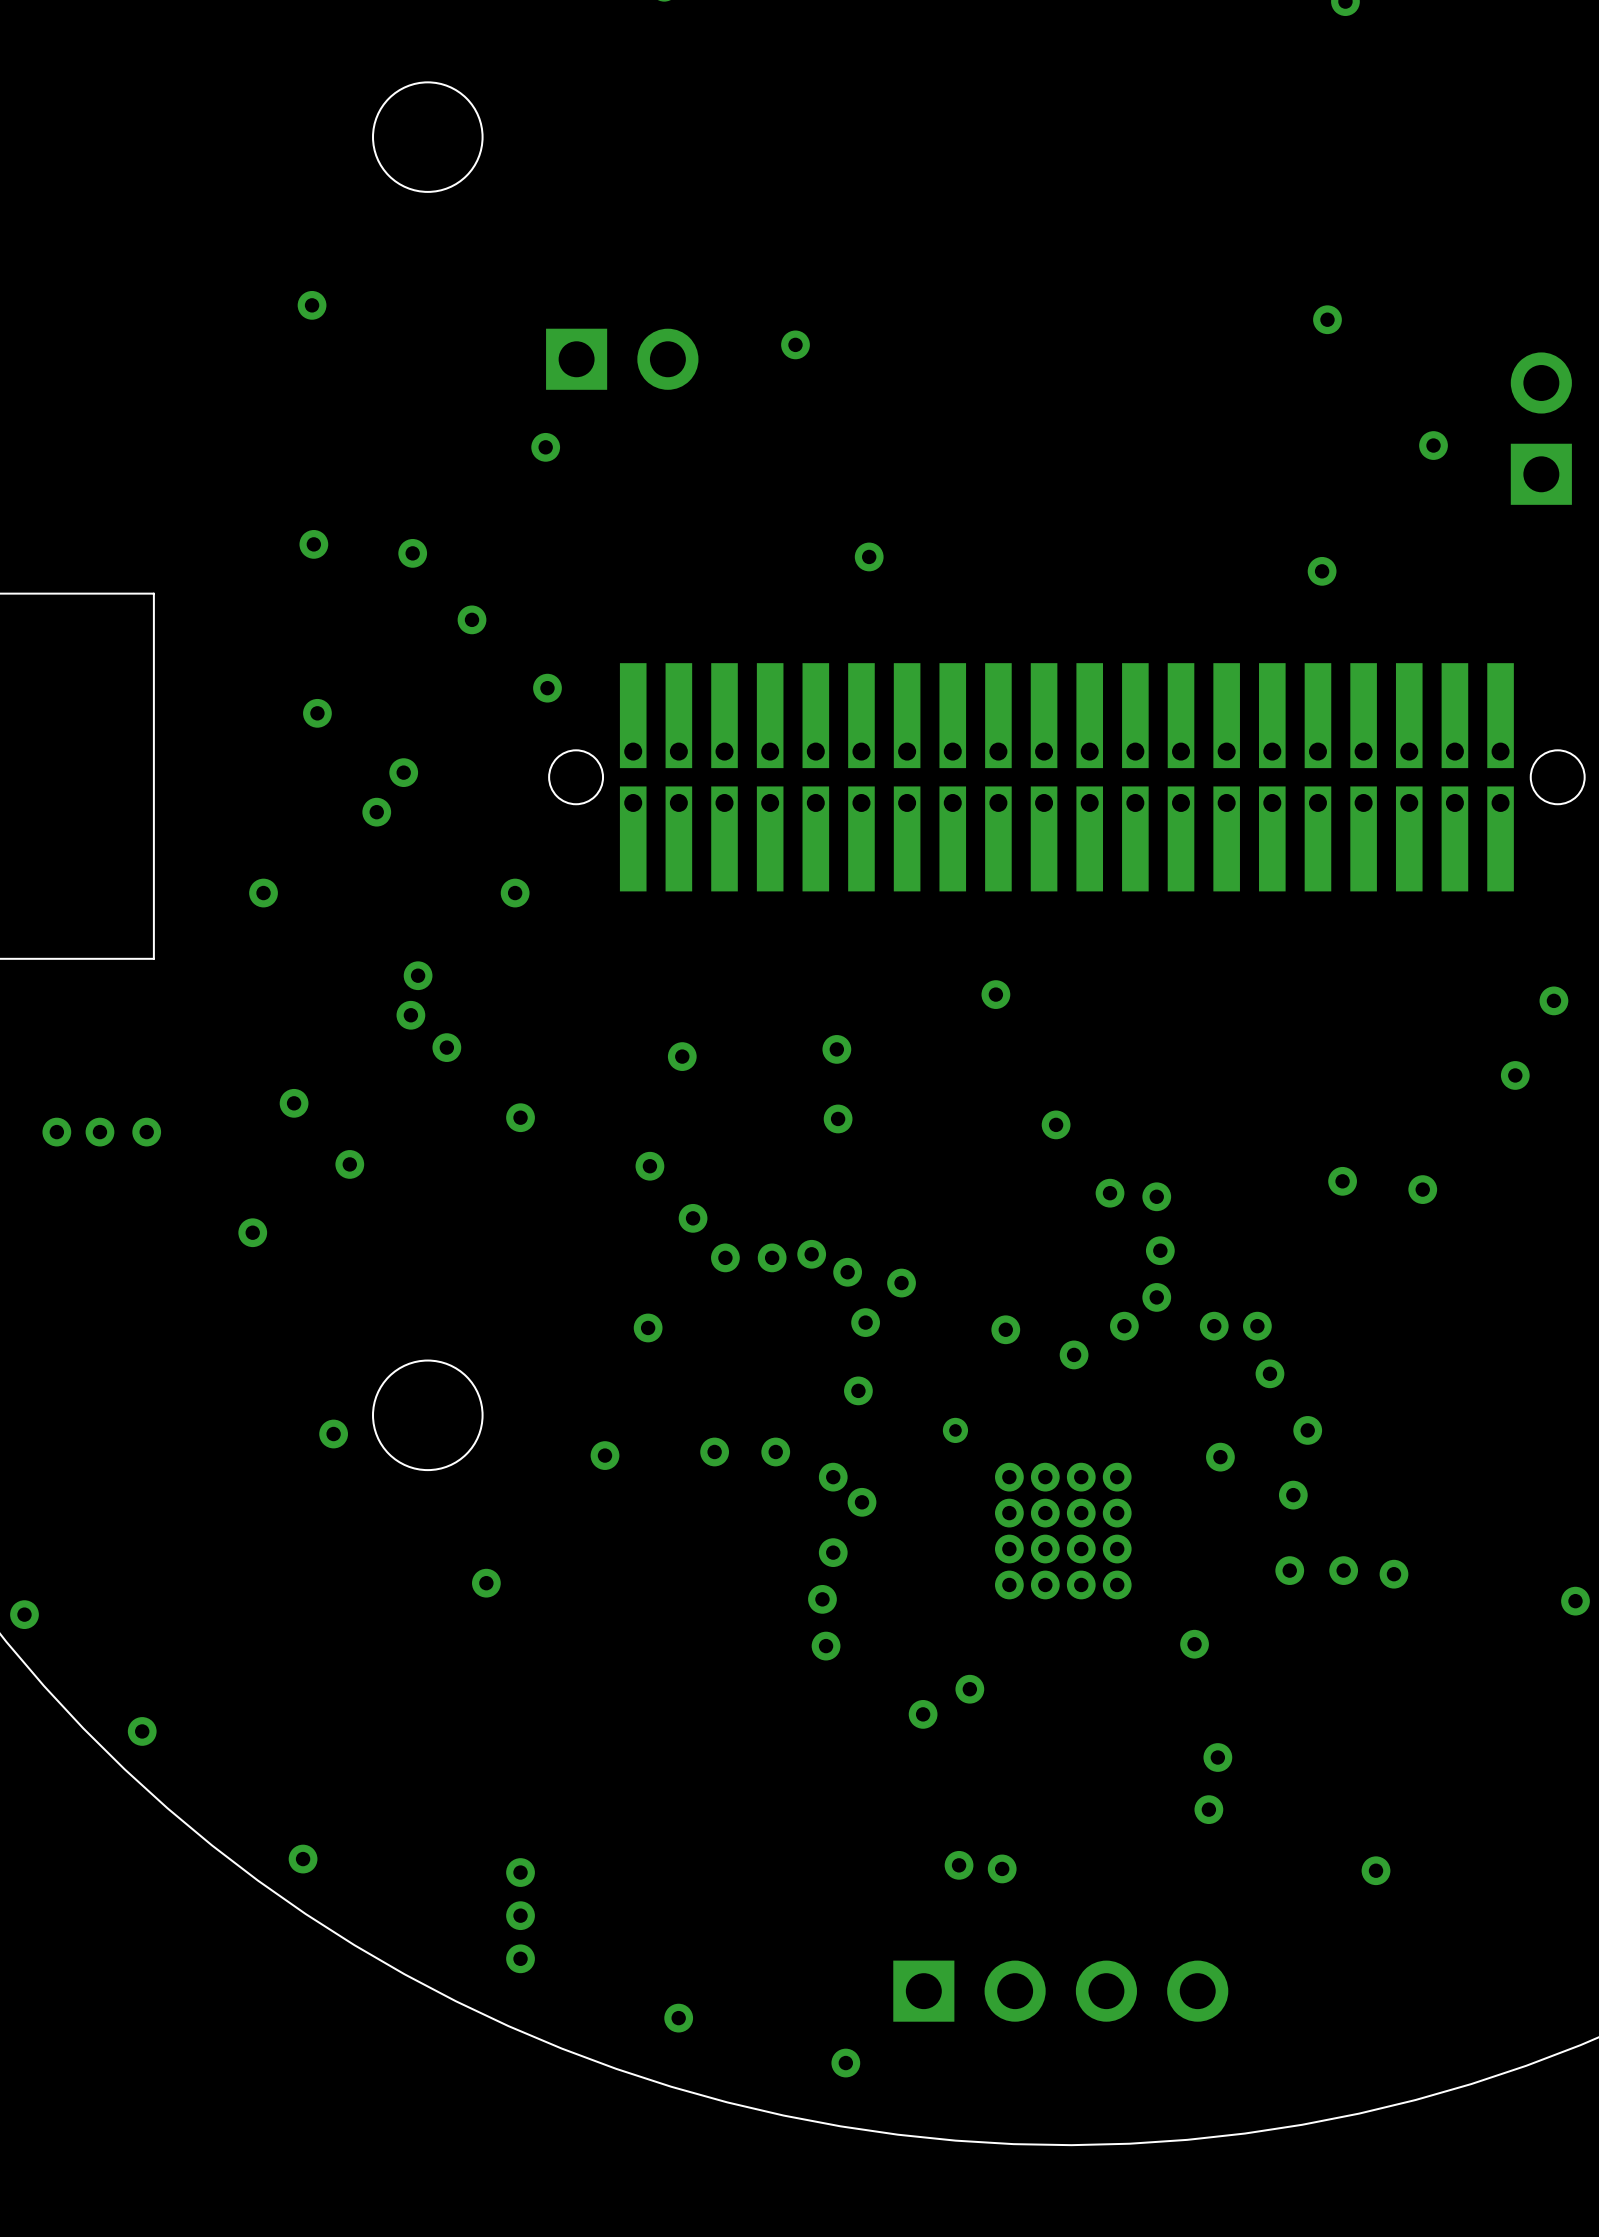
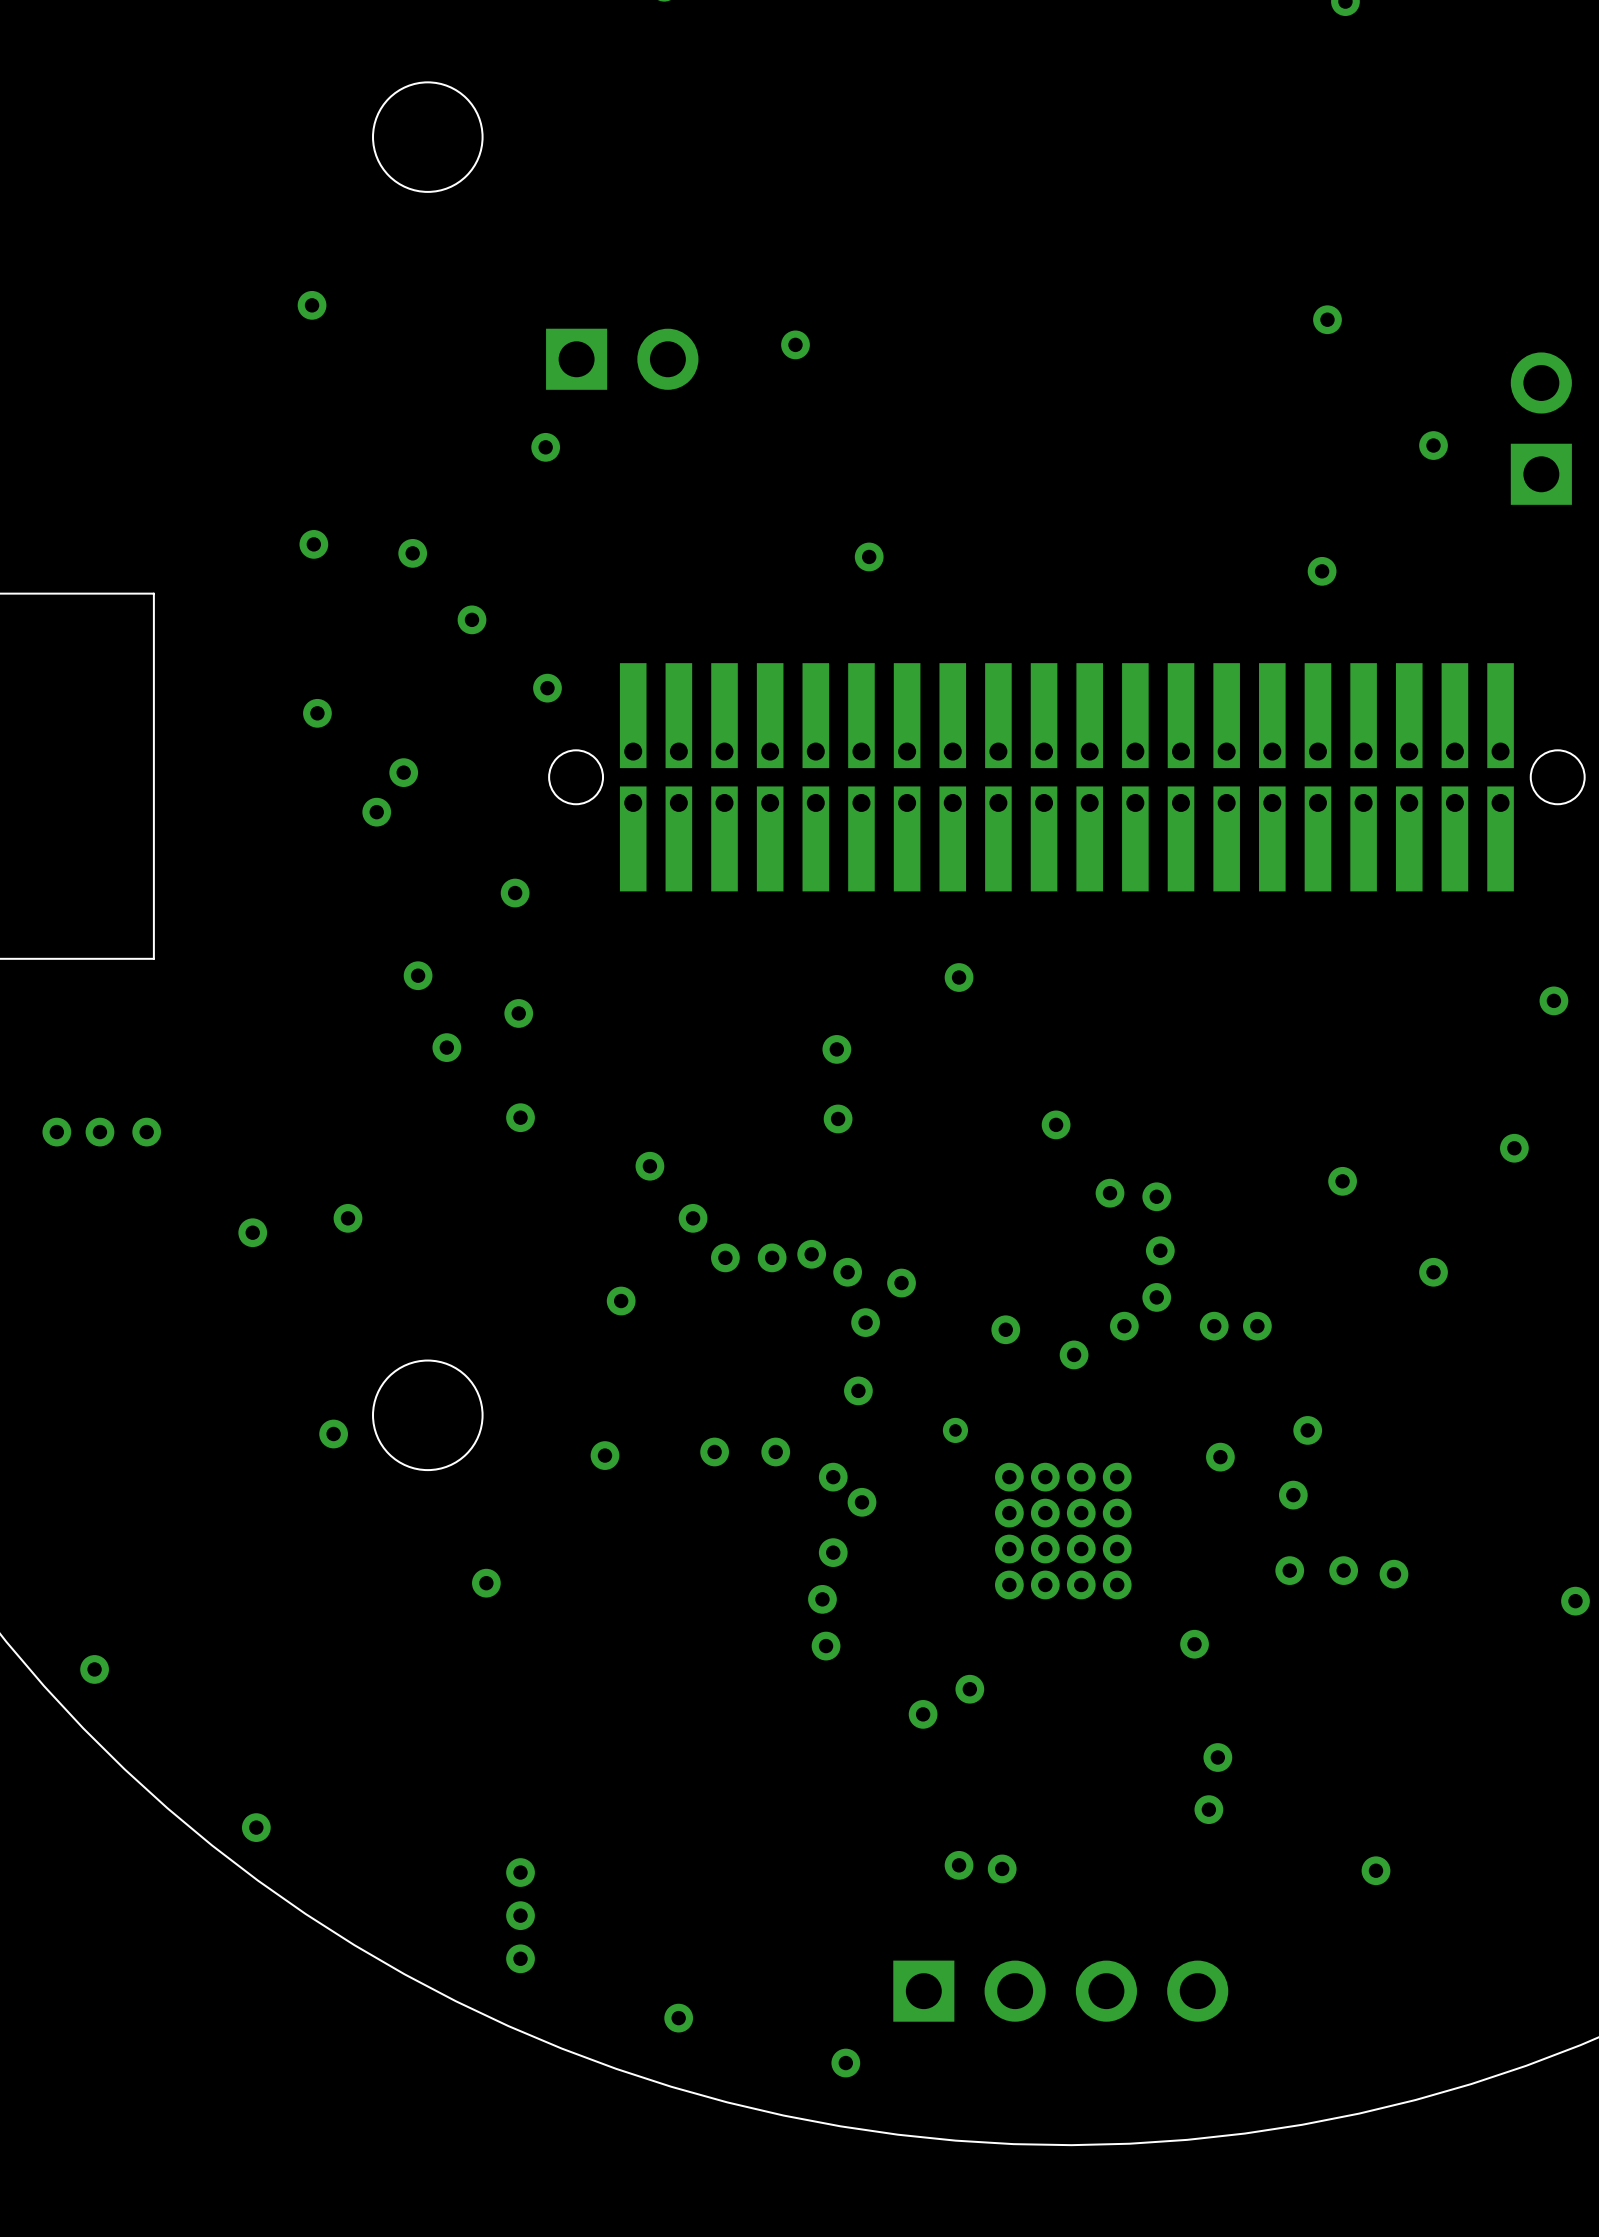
via: (263, 893) -> none
via position: (995, 994) -> (959, 977)
via: none -> (518, 1013)
via: (410, 1015) -> none
via: (682, 1056) -> none
via: (1515, 1075) -> none
via: (294, 1103) -> none
via: none -> (1514, 1148)
via position: (349, 1164) -> (347, 1218)
via: (1422, 1189) -> none
via: none -> (1433, 1272)
via position: (648, 1327) -> (621, 1301)
via: (1269, 1373) -> none
via: (24, 1614) -> none
via: none -> (94, 1669)
via: (142, 1731) -> none
via position: (303, 1859) -> (256, 1827)

